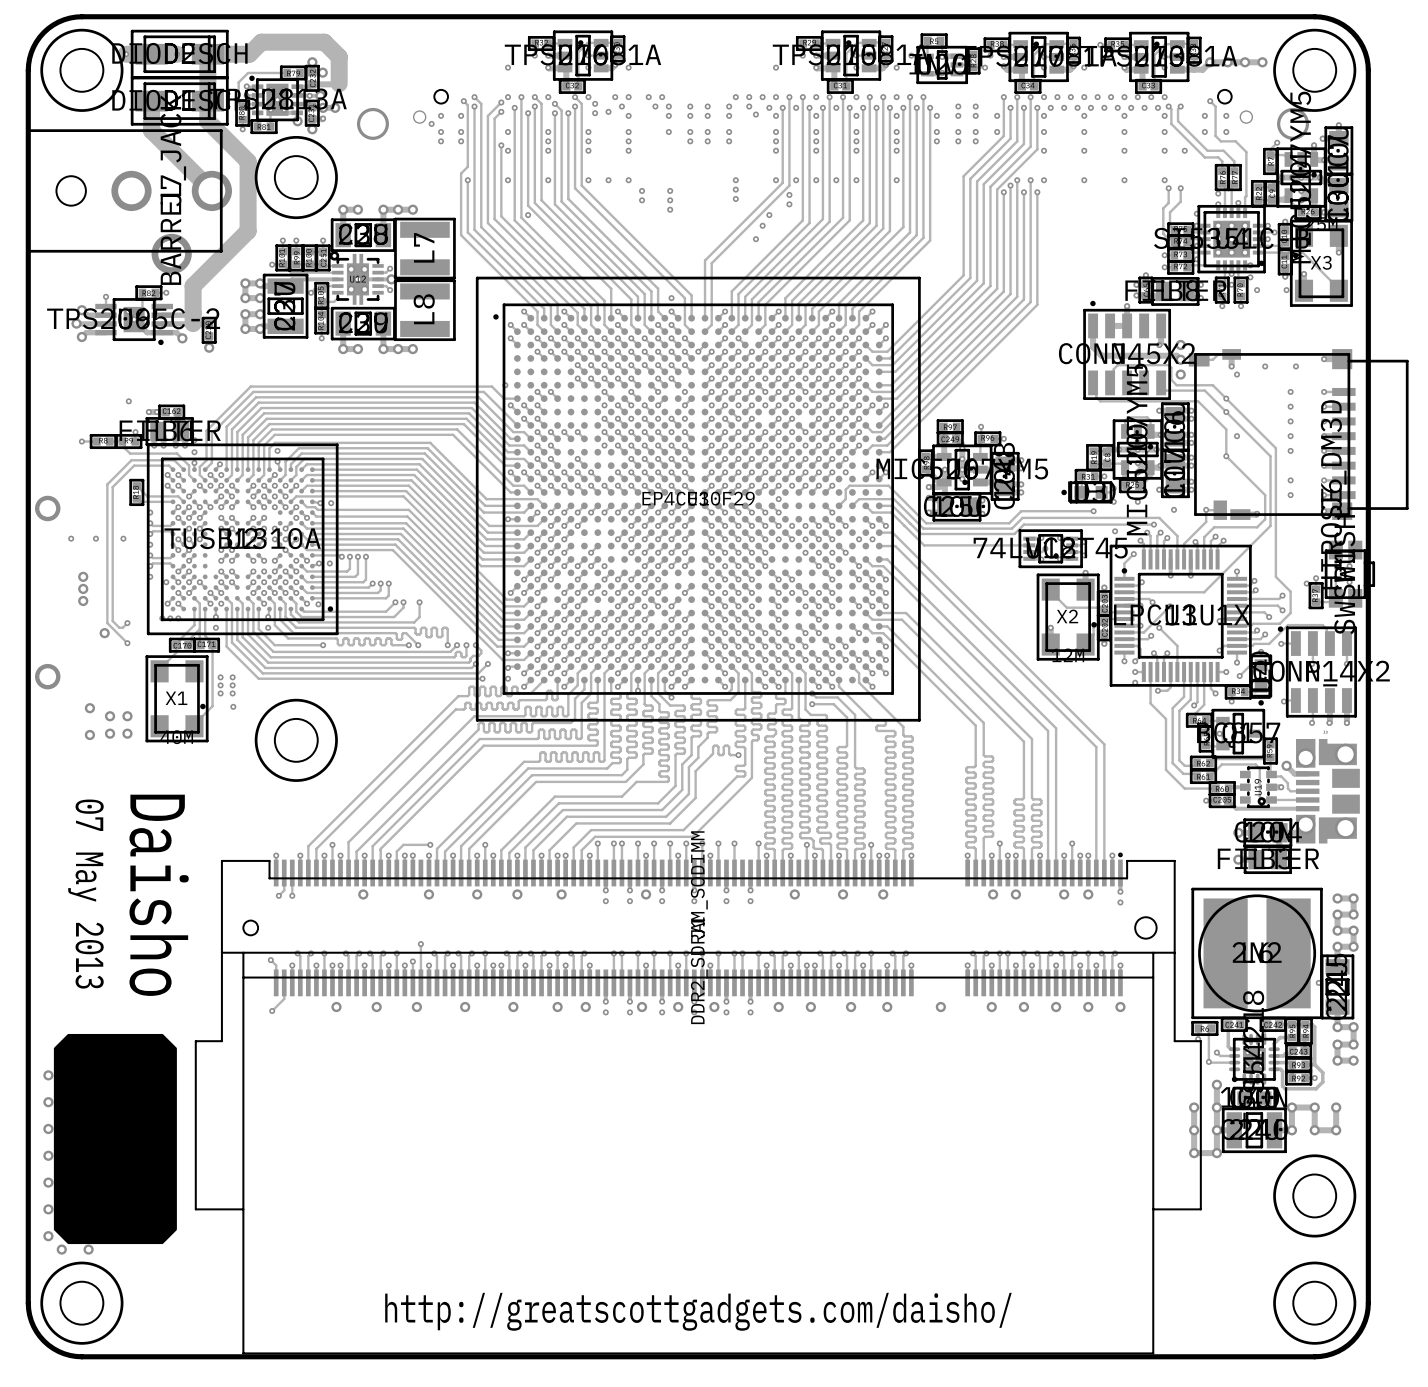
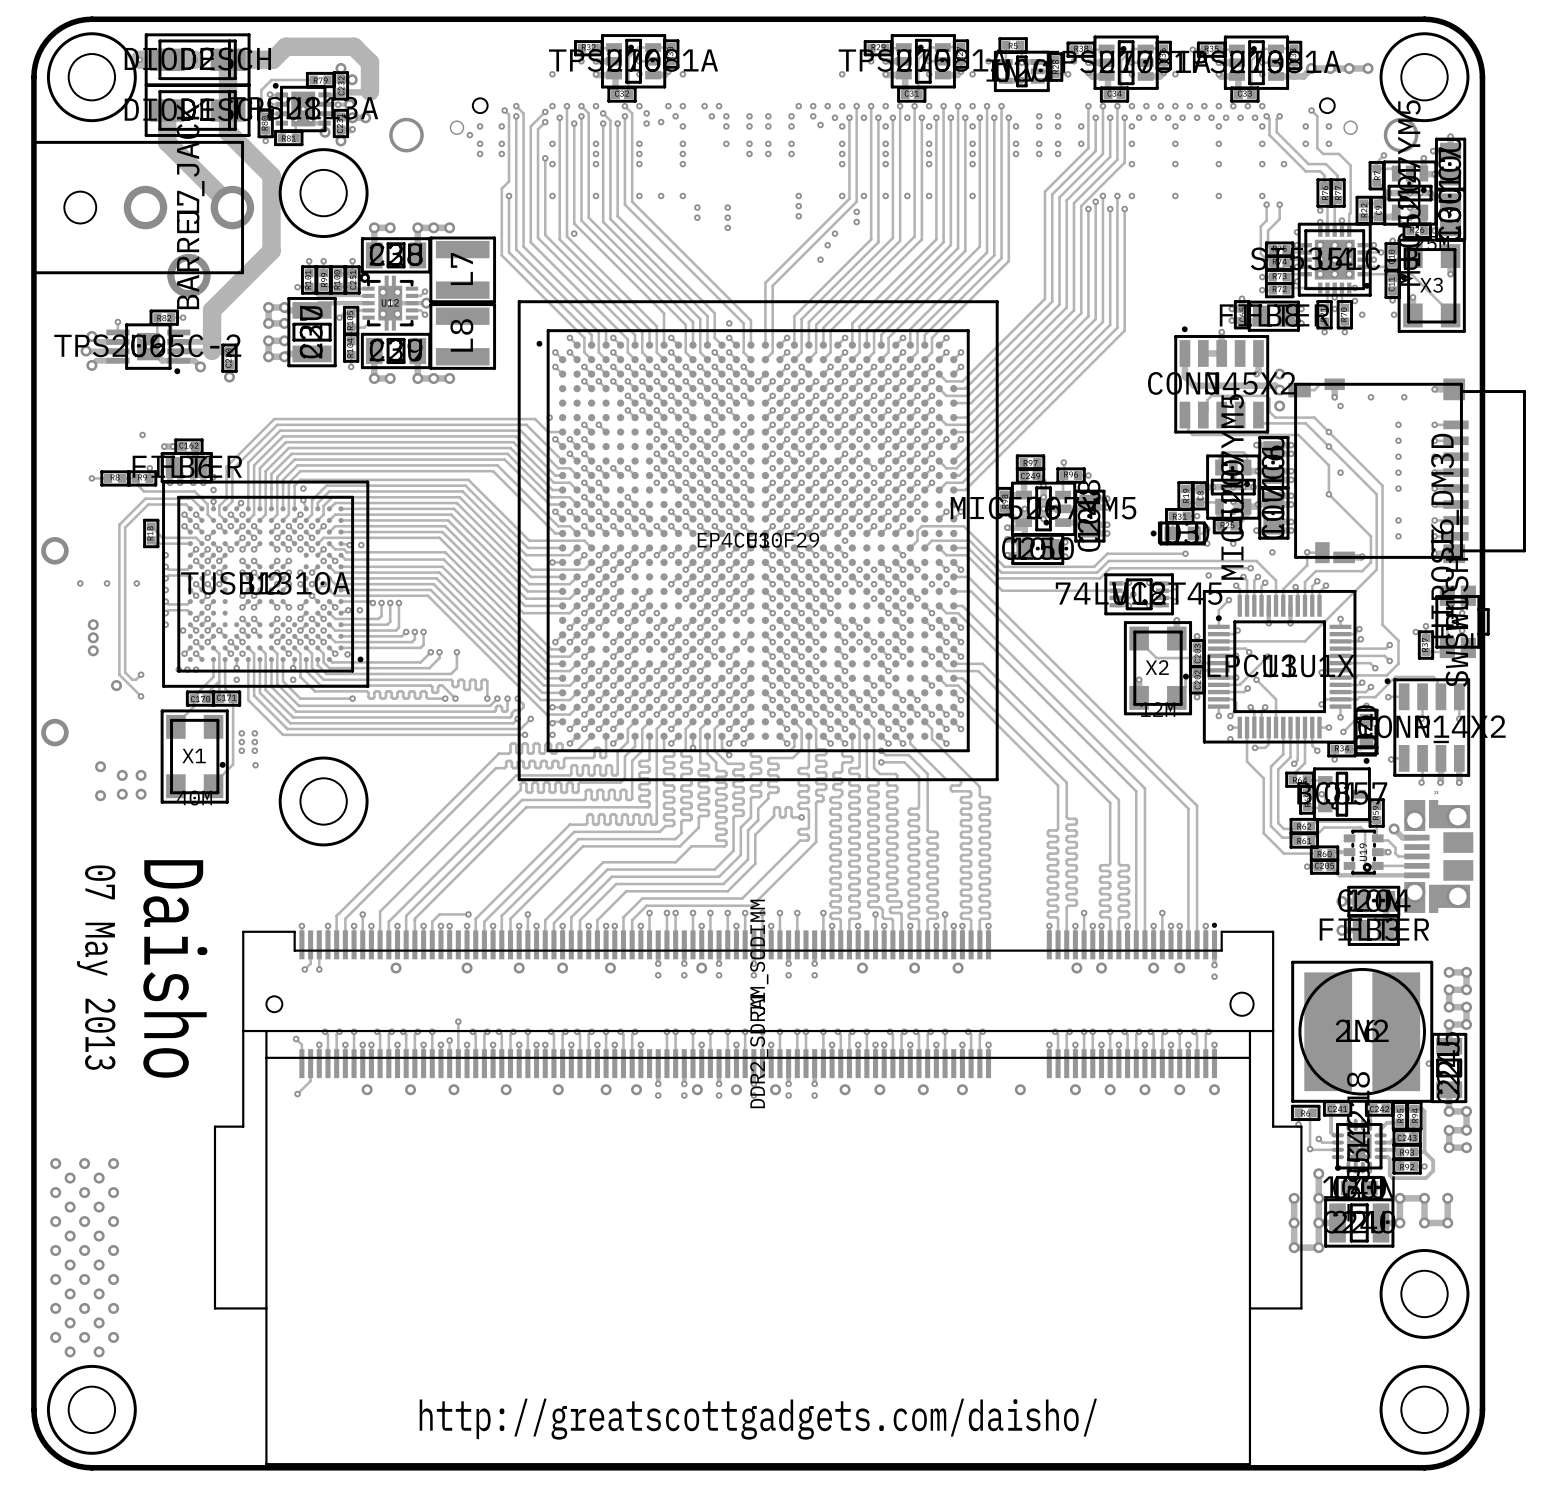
drawing: [53, 1033, 177, 1245] -> none

